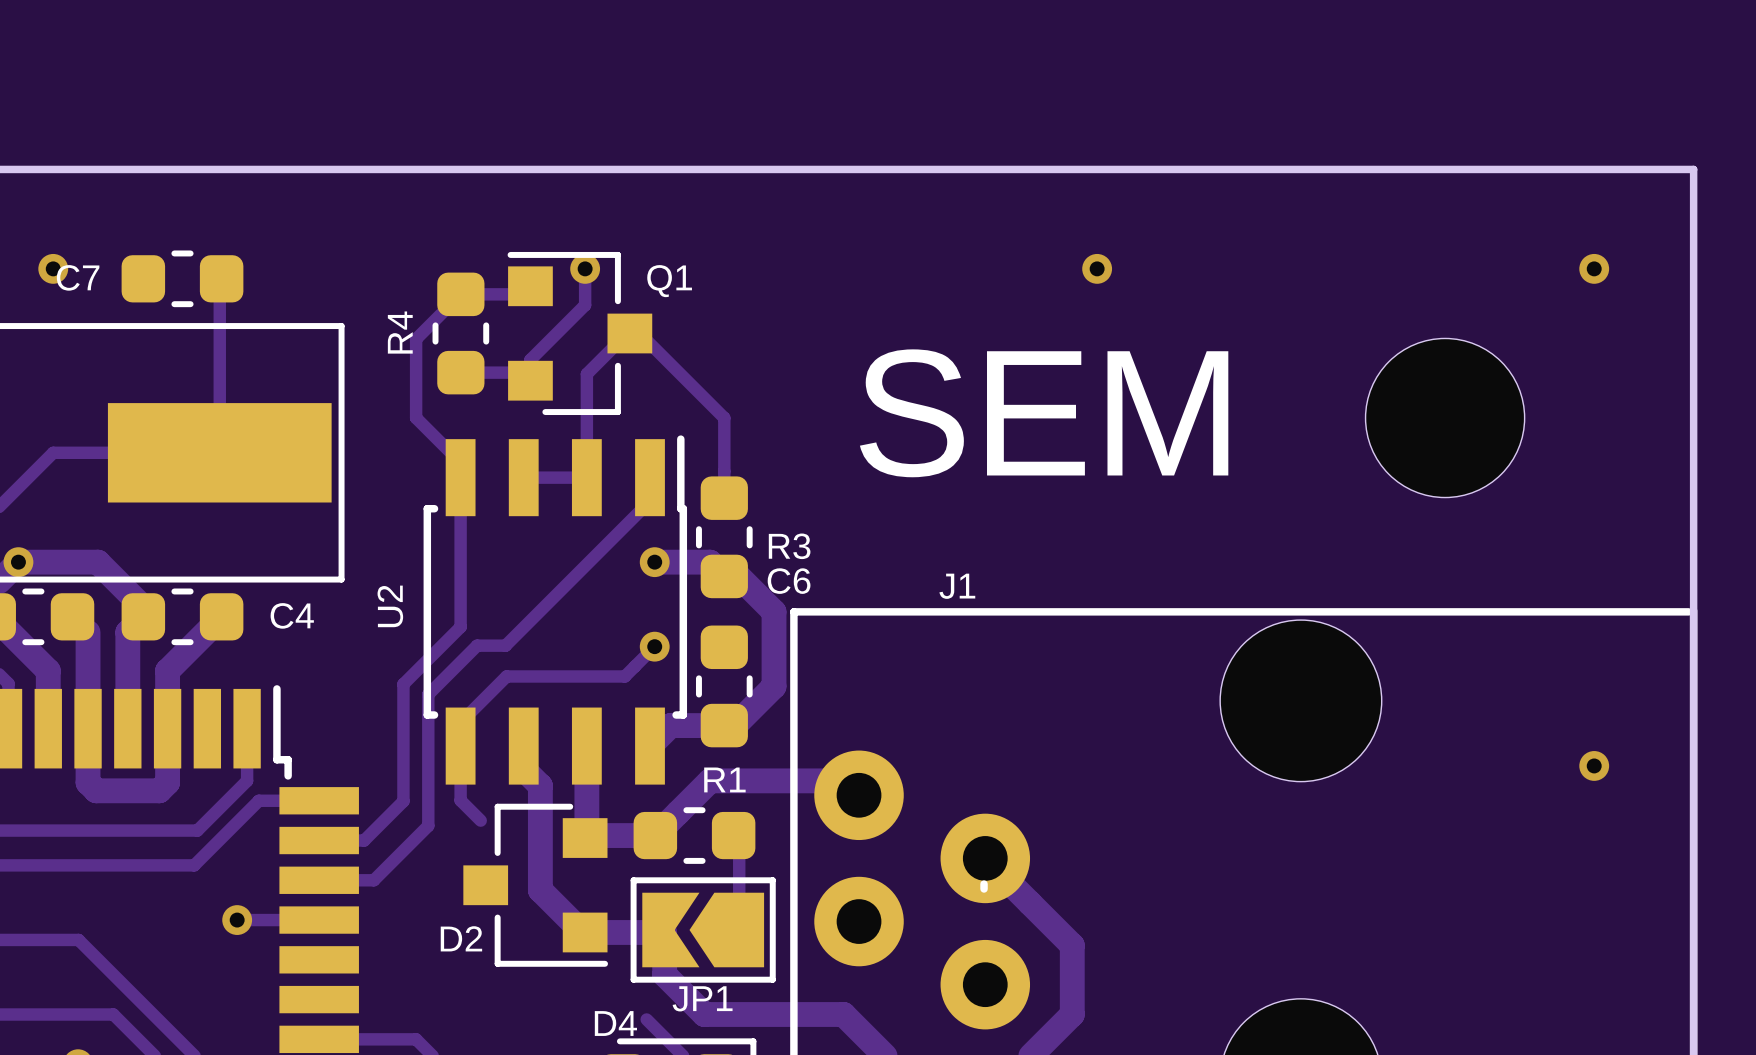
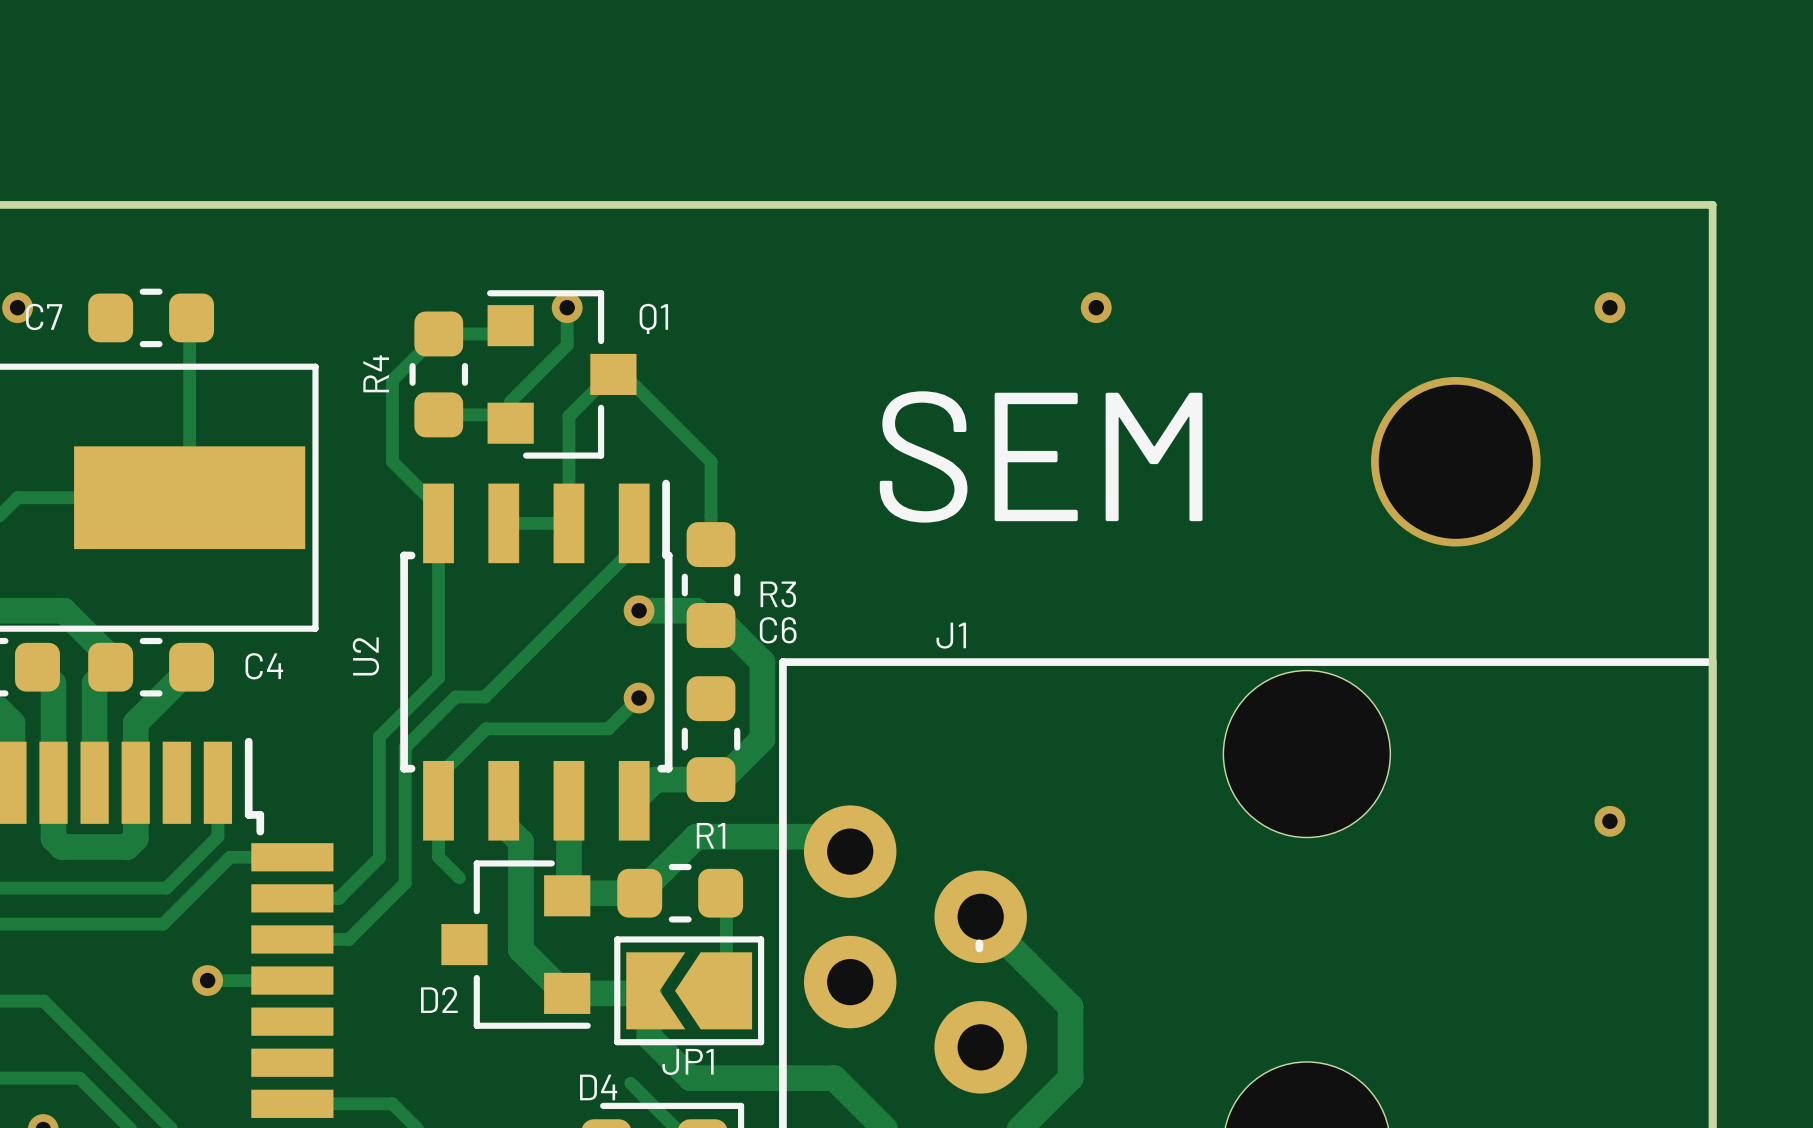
part: (1445, 418) -> none
via: none -> (1455, 461)

